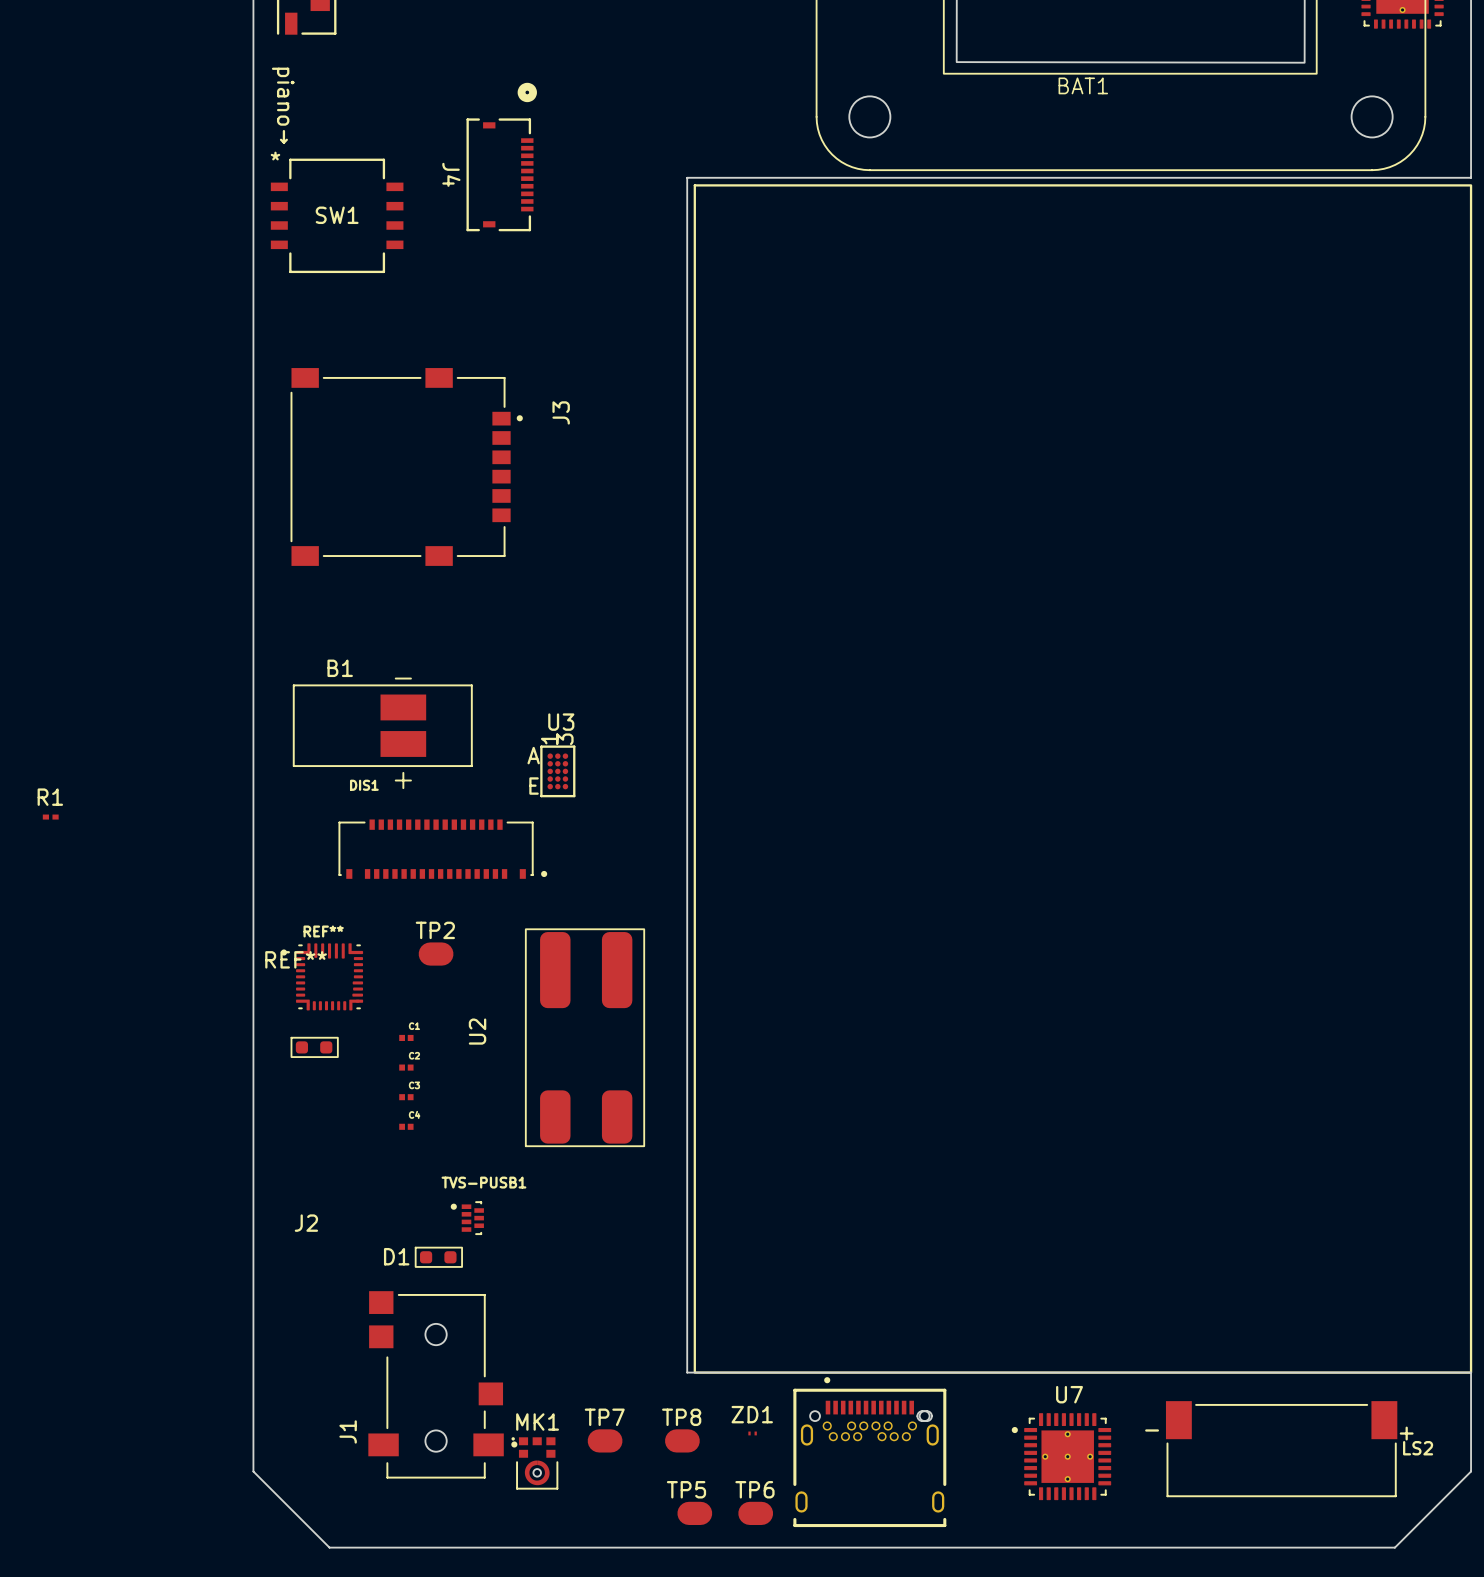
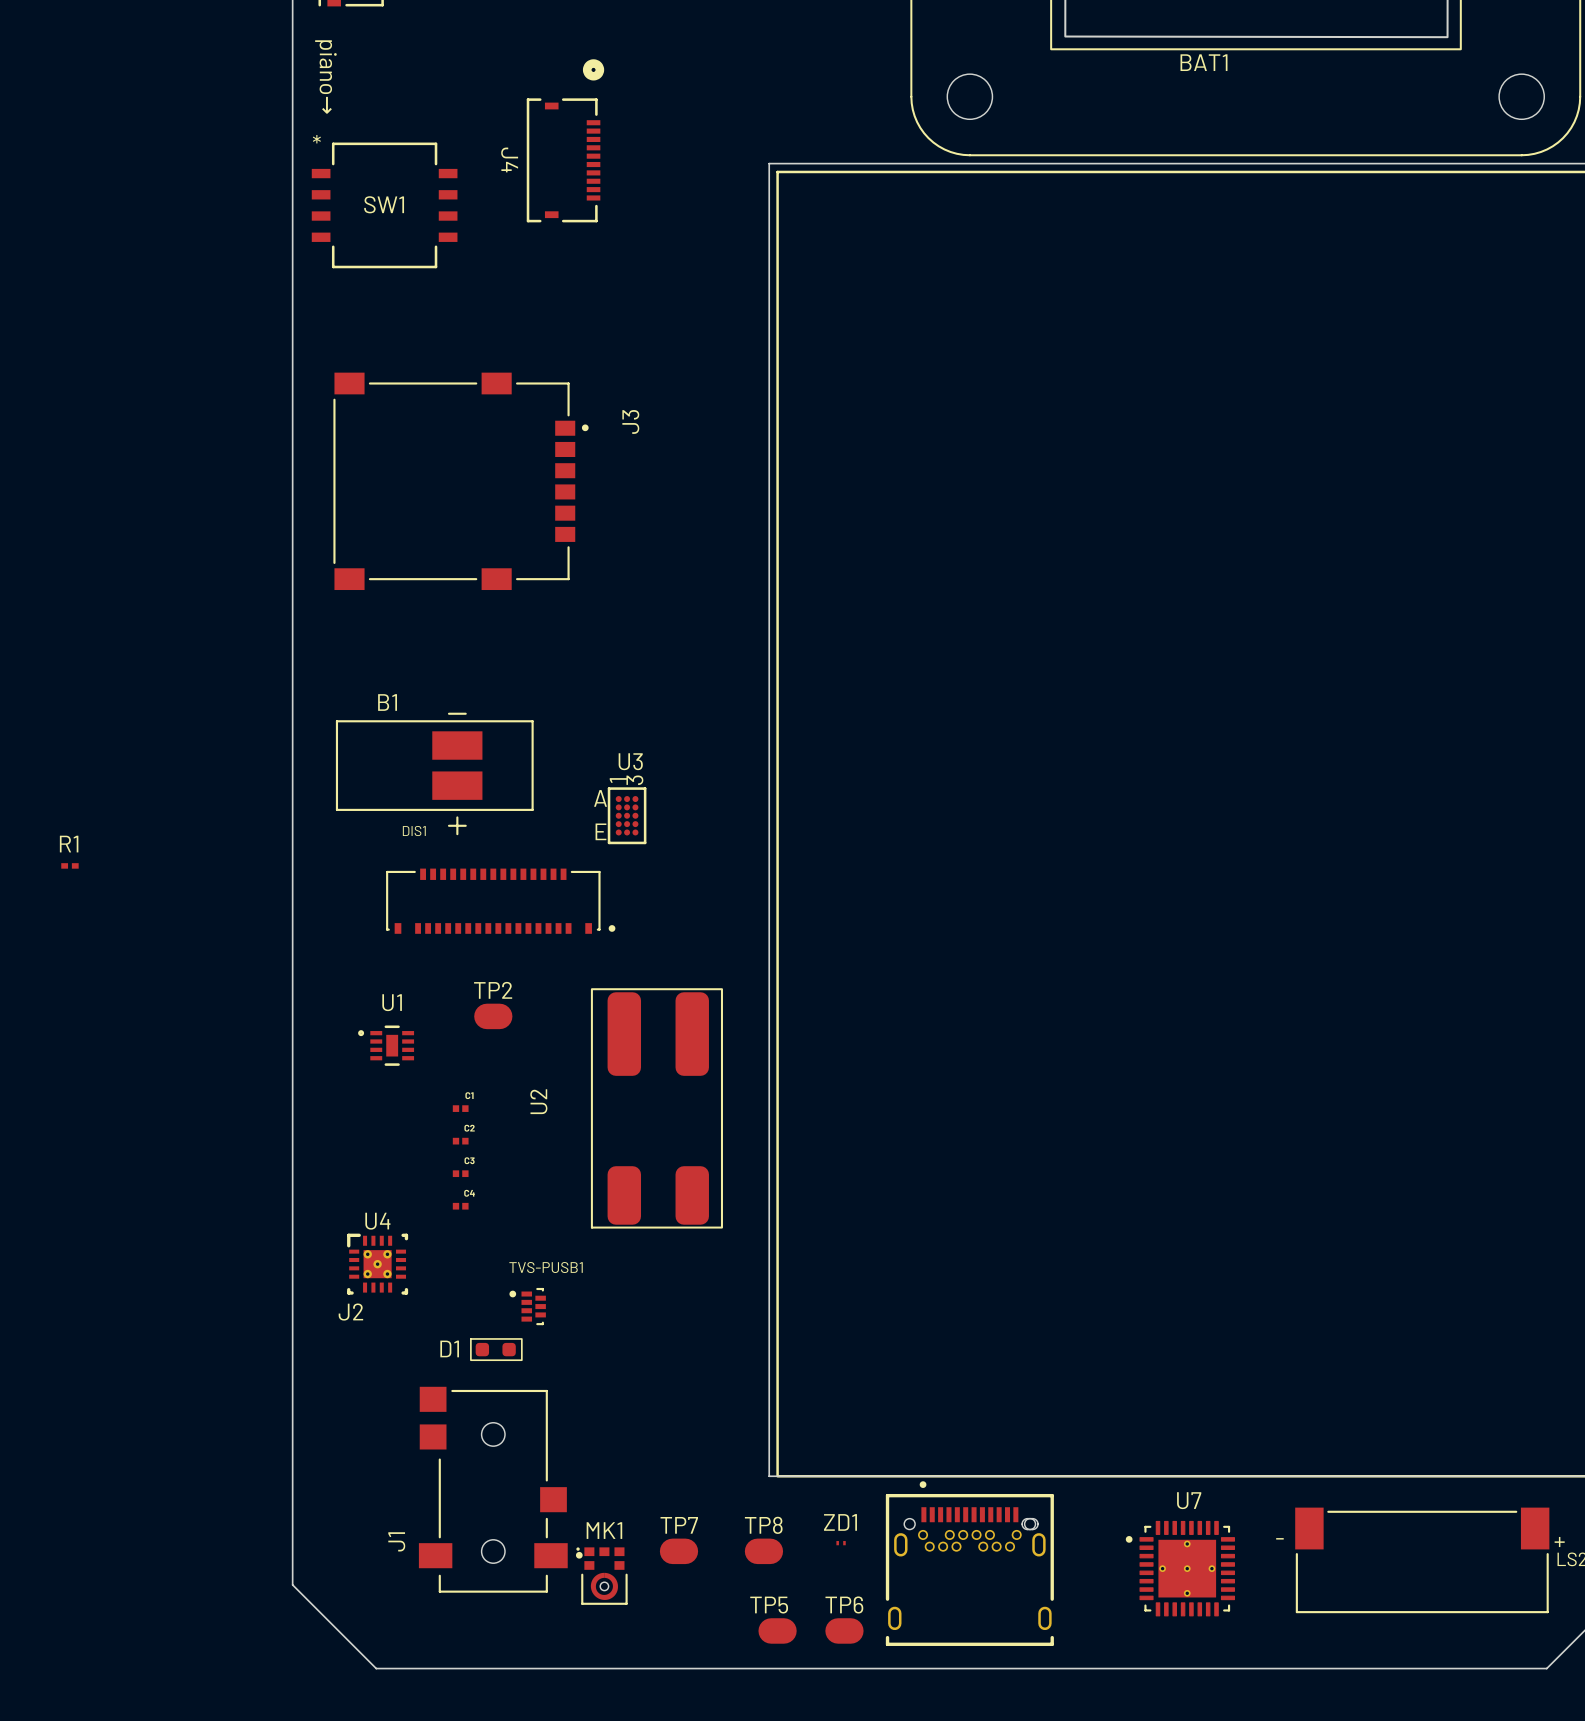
REF**: (321, 976) -> none
U1: none -> (386, 1045)
REF**: (314, 1047) -> none
U4: none -> (377, 1264)

